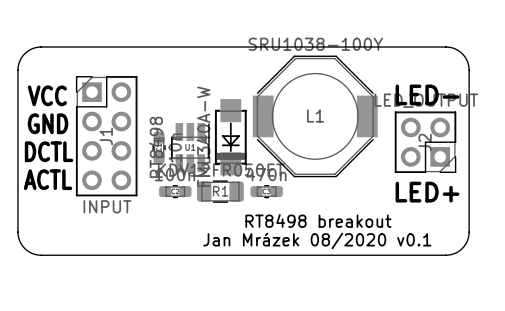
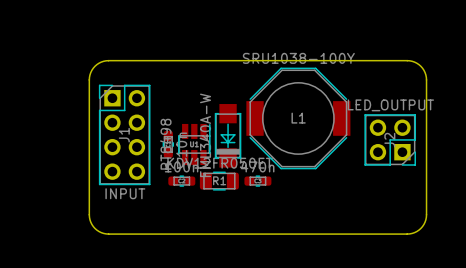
board edge: (87, 47) (35, 47) (22, 56) (17, 70) (17, 232) (19, 240) (24, 248) (35, 254) (87, 255) -> (108, 60) (94, 66) (89, 79) (89, 217) (94, 228) (108, 234)
text: LED- (427, 94) -> none
text: VCC (47, 95) -> none
text: GND (48, 123) -> none
text: DCTL (49, 151) -> none
text: ACTL (48, 179) -> none
text: LED+ (427, 192) -> none
text: RT8498 breakout (318, 220) -> none
text: Jan Mrázek 08/2020 v0.1 (317, 240) -> none

